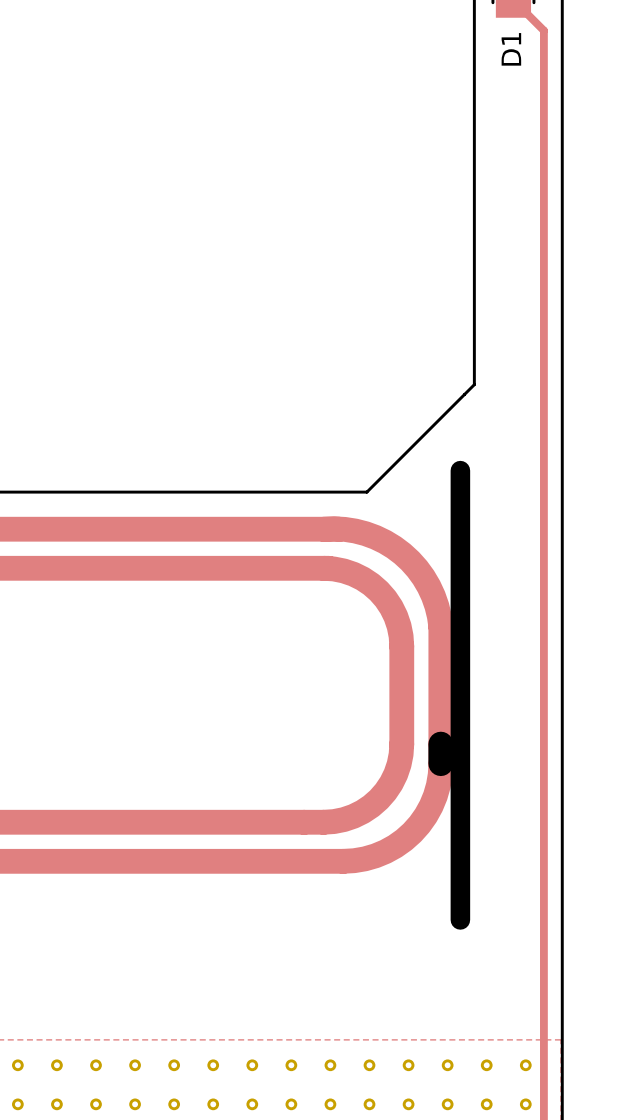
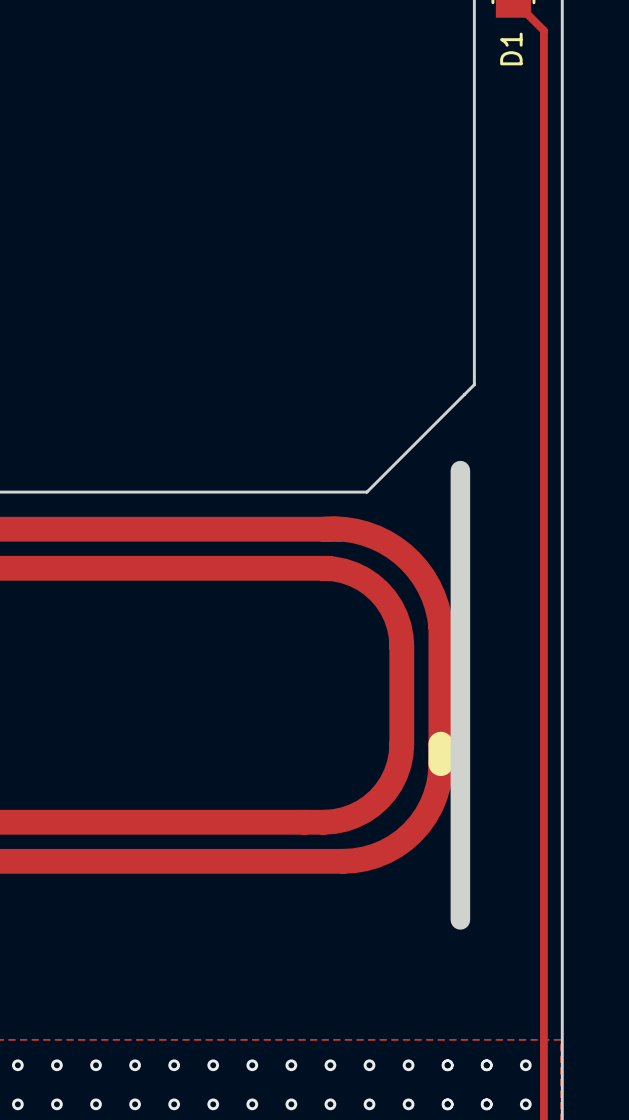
part: (17, 1065) -> none
via: none -> (17, 1065)
part: (56, 1065) -> none
via: none -> (56, 1065)
part: (96, 1065) -> none
via: none -> (96, 1065)
part: (135, 1065) -> none
via: none -> (135, 1065)
part: (174, 1065) -> none
via: none -> (174, 1065)
part: (213, 1065) -> none
via: none -> (213, 1065)
part: (252, 1065) -> none
via: none -> (252, 1065)
part: (291, 1065) -> none
via: none -> (291, 1065)
part: (330, 1065) -> none
via: none -> (330, 1065)
part: (369, 1065) -> none
via: none -> (369, 1065)
part: (408, 1065) -> none
via: none -> (408, 1065)
part: (447, 1065) -> none
via: none -> (447, 1065)
part: (486, 1065) -> none
via: none -> (486, 1065)
part: (525, 1065) -> none
via: none -> (525, 1065)
part: (17, 1104) -> none
via: none -> (17, 1104)
part: (56, 1104) -> none
via: none -> (56, 1104)
part: (96, 1104) -> none
via: none -> (96, 1104)
part: (135, 1104) -> none
via: none -> (135, 1104)
part: (174, 1104) -> none
via: none -> (174, 1104)
part: (213, 1104) -> none
via: none -> (213, 1104)
part: (252, 1104) -> none
via: none -> (252, 1104)
part: (291, 1104) -> none
via: none -> (291, 1104)
part: (330, 1104) -> none
via: none -> (330, 1104)
part: (369, 1104) -> none
via: none -> (369, 1104)
part: (408, 1104) -> none
via: none -> (408, 1104)
part: (447, 1104) -> none
via: none -> (447, 1104)
part: (486, 1104) -> none
via: none -> (486, 1104)
part: (525, 1104) -> none
via: none -> (525, 1104)

